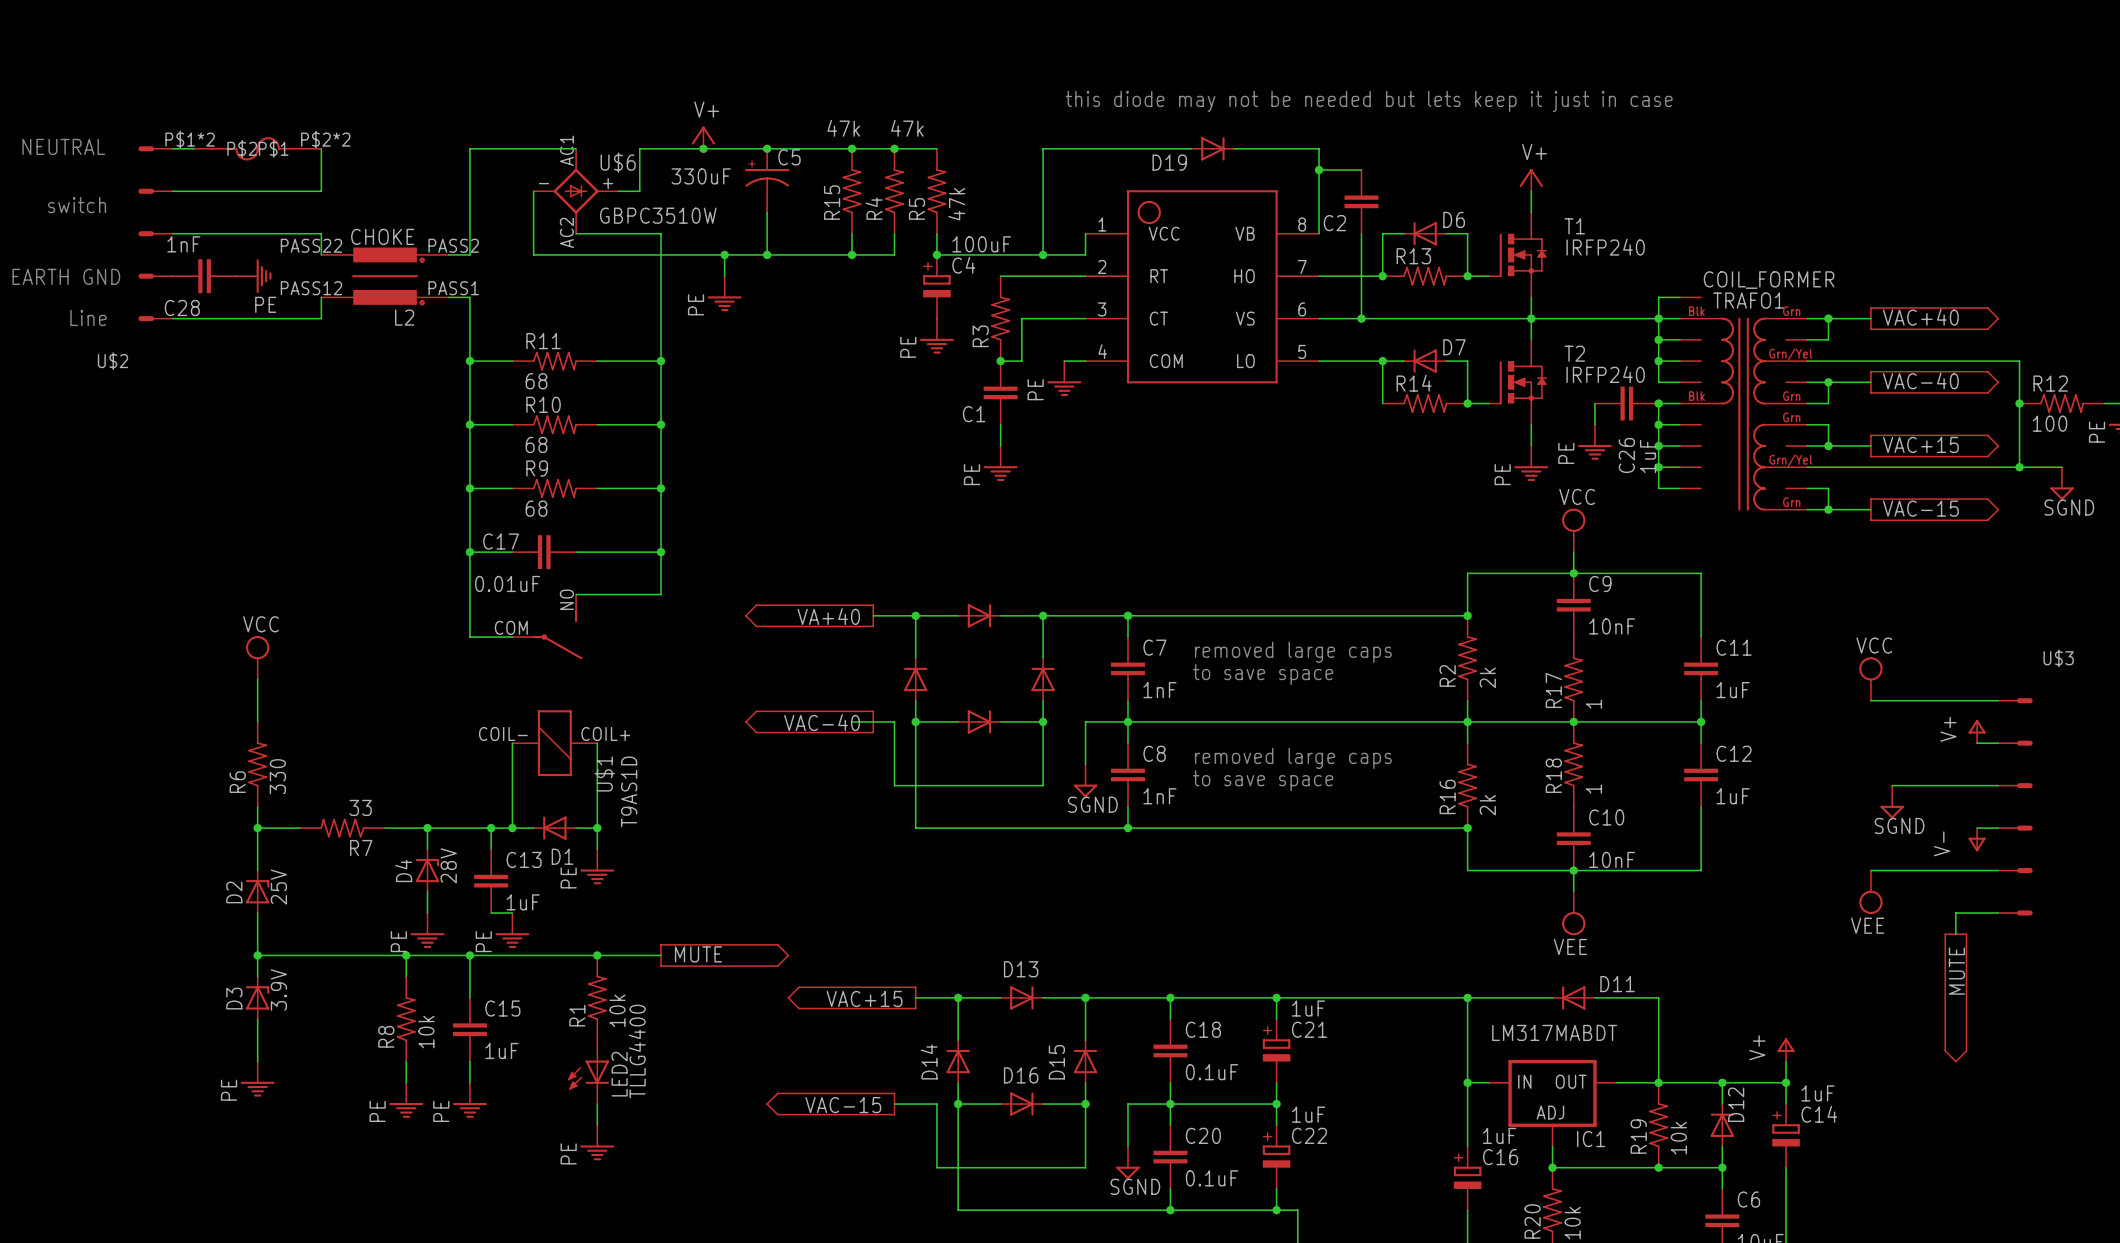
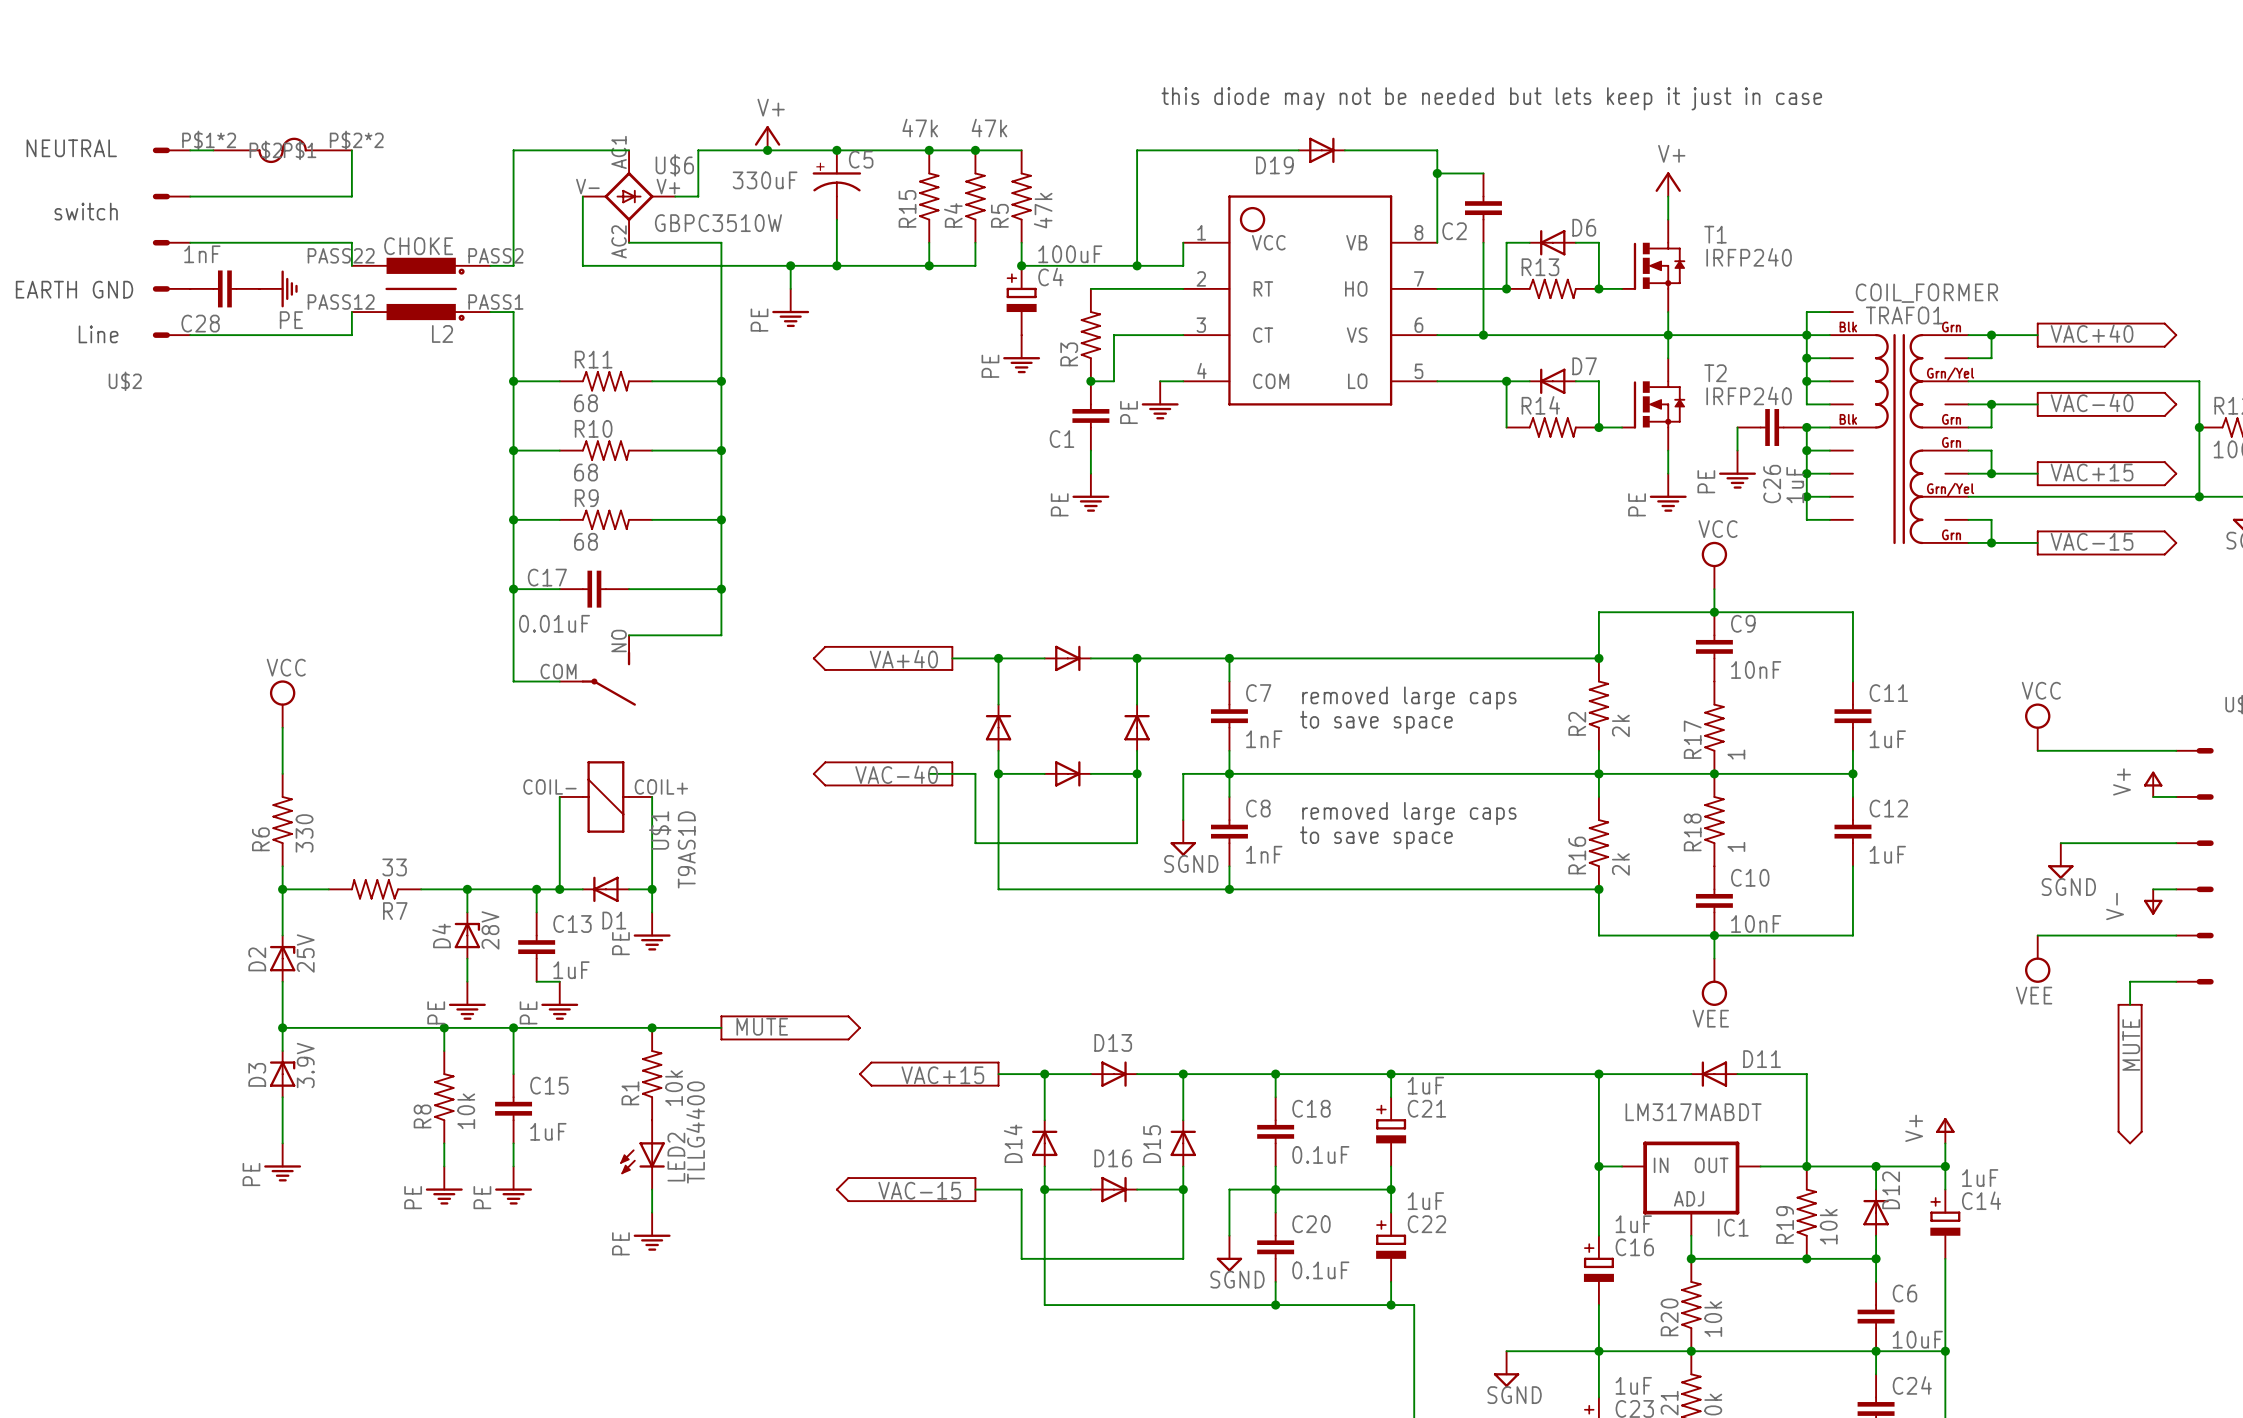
U$6 pin number: - (544, 183) -> V- (587, 186)
U$6 pin number: + (608, 183) -> V+ (668, 186)

